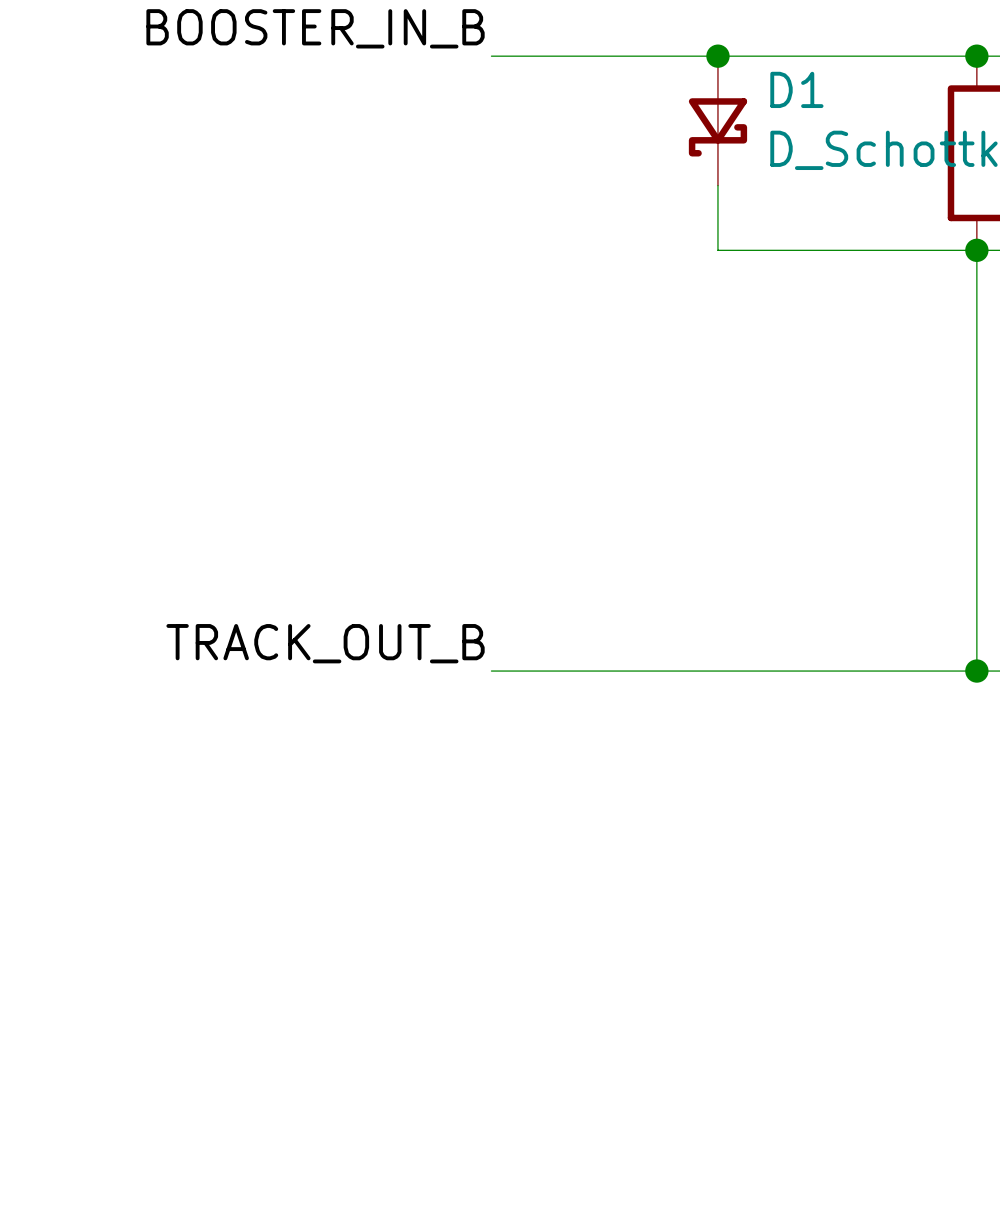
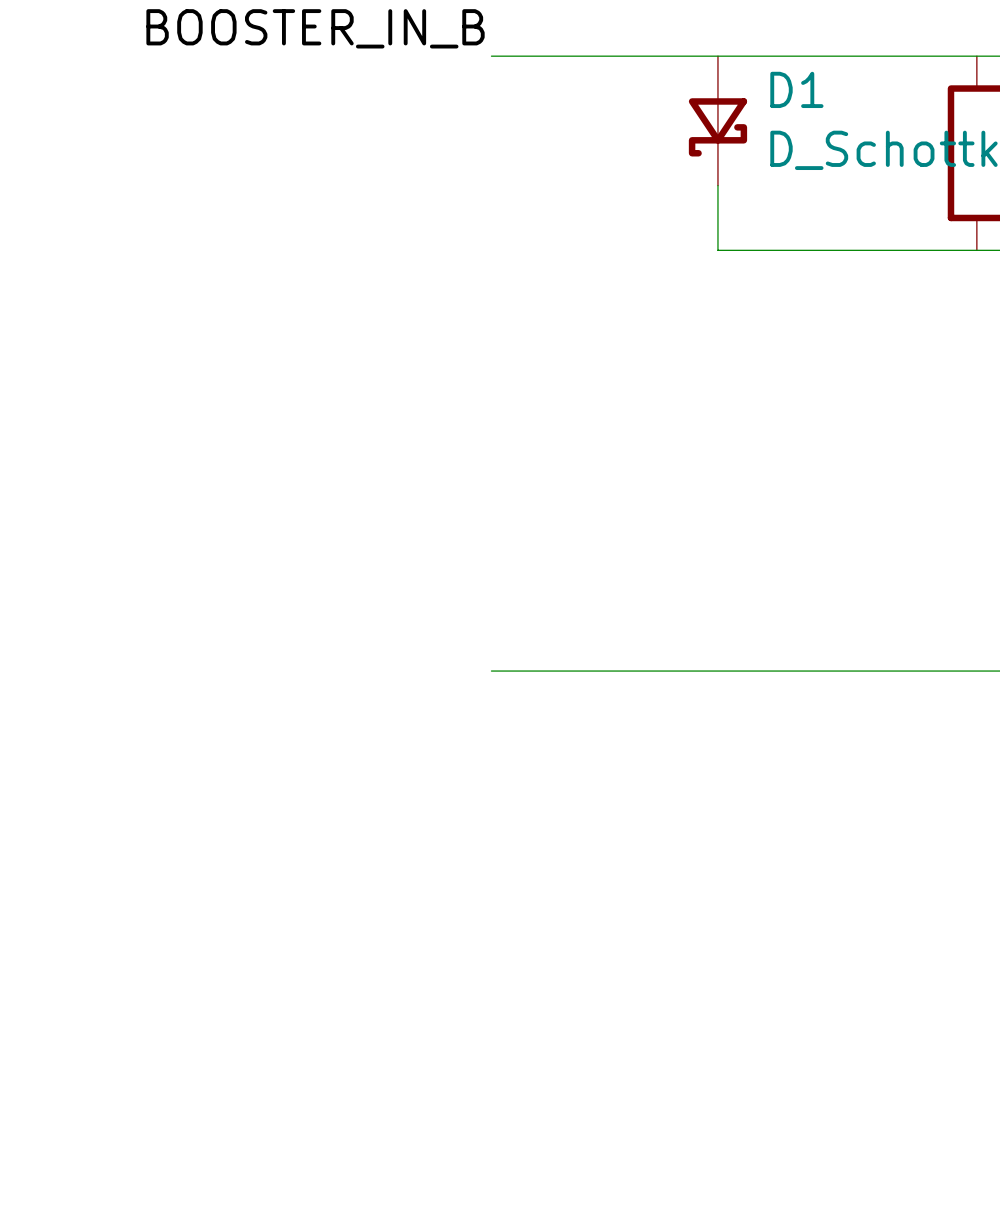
junction: (717, 56) -> none
junction: (976, 56) -> none
wire: (976, 250) (976, 671) -> none
junction: (976, 250) -> none
label: TRACK_OUT_B (325, 643) -> none
junction: (976, 671) -> none

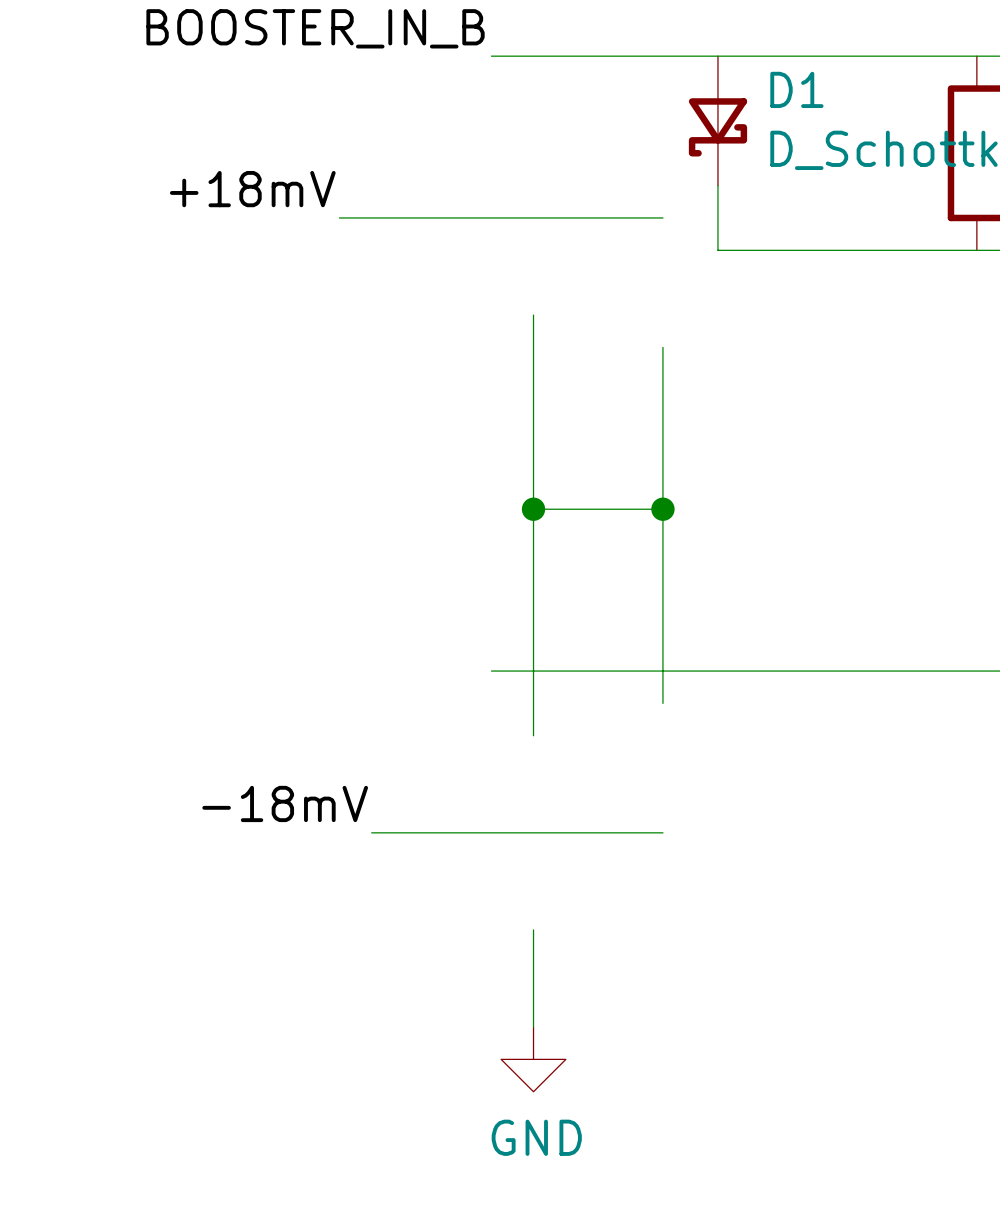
label: none -> +18mV (252, 189)
wire: none -> (339, 217) (662, 217)
wire: none -> (533, 315) (533, 735)
wire: none -> (662, 347) (662, 703)
wire: none -> (533, 509) (662, 509)
junction: none -> (533, 509)
junction: none -> (662, 509)
label: none -> -18mV (285, 803)
wire: none -> (371, 832) (662, 832)
wire: none -> (533, 929) (533, 1027)
power symbol: none -> GND (533, 1059)

